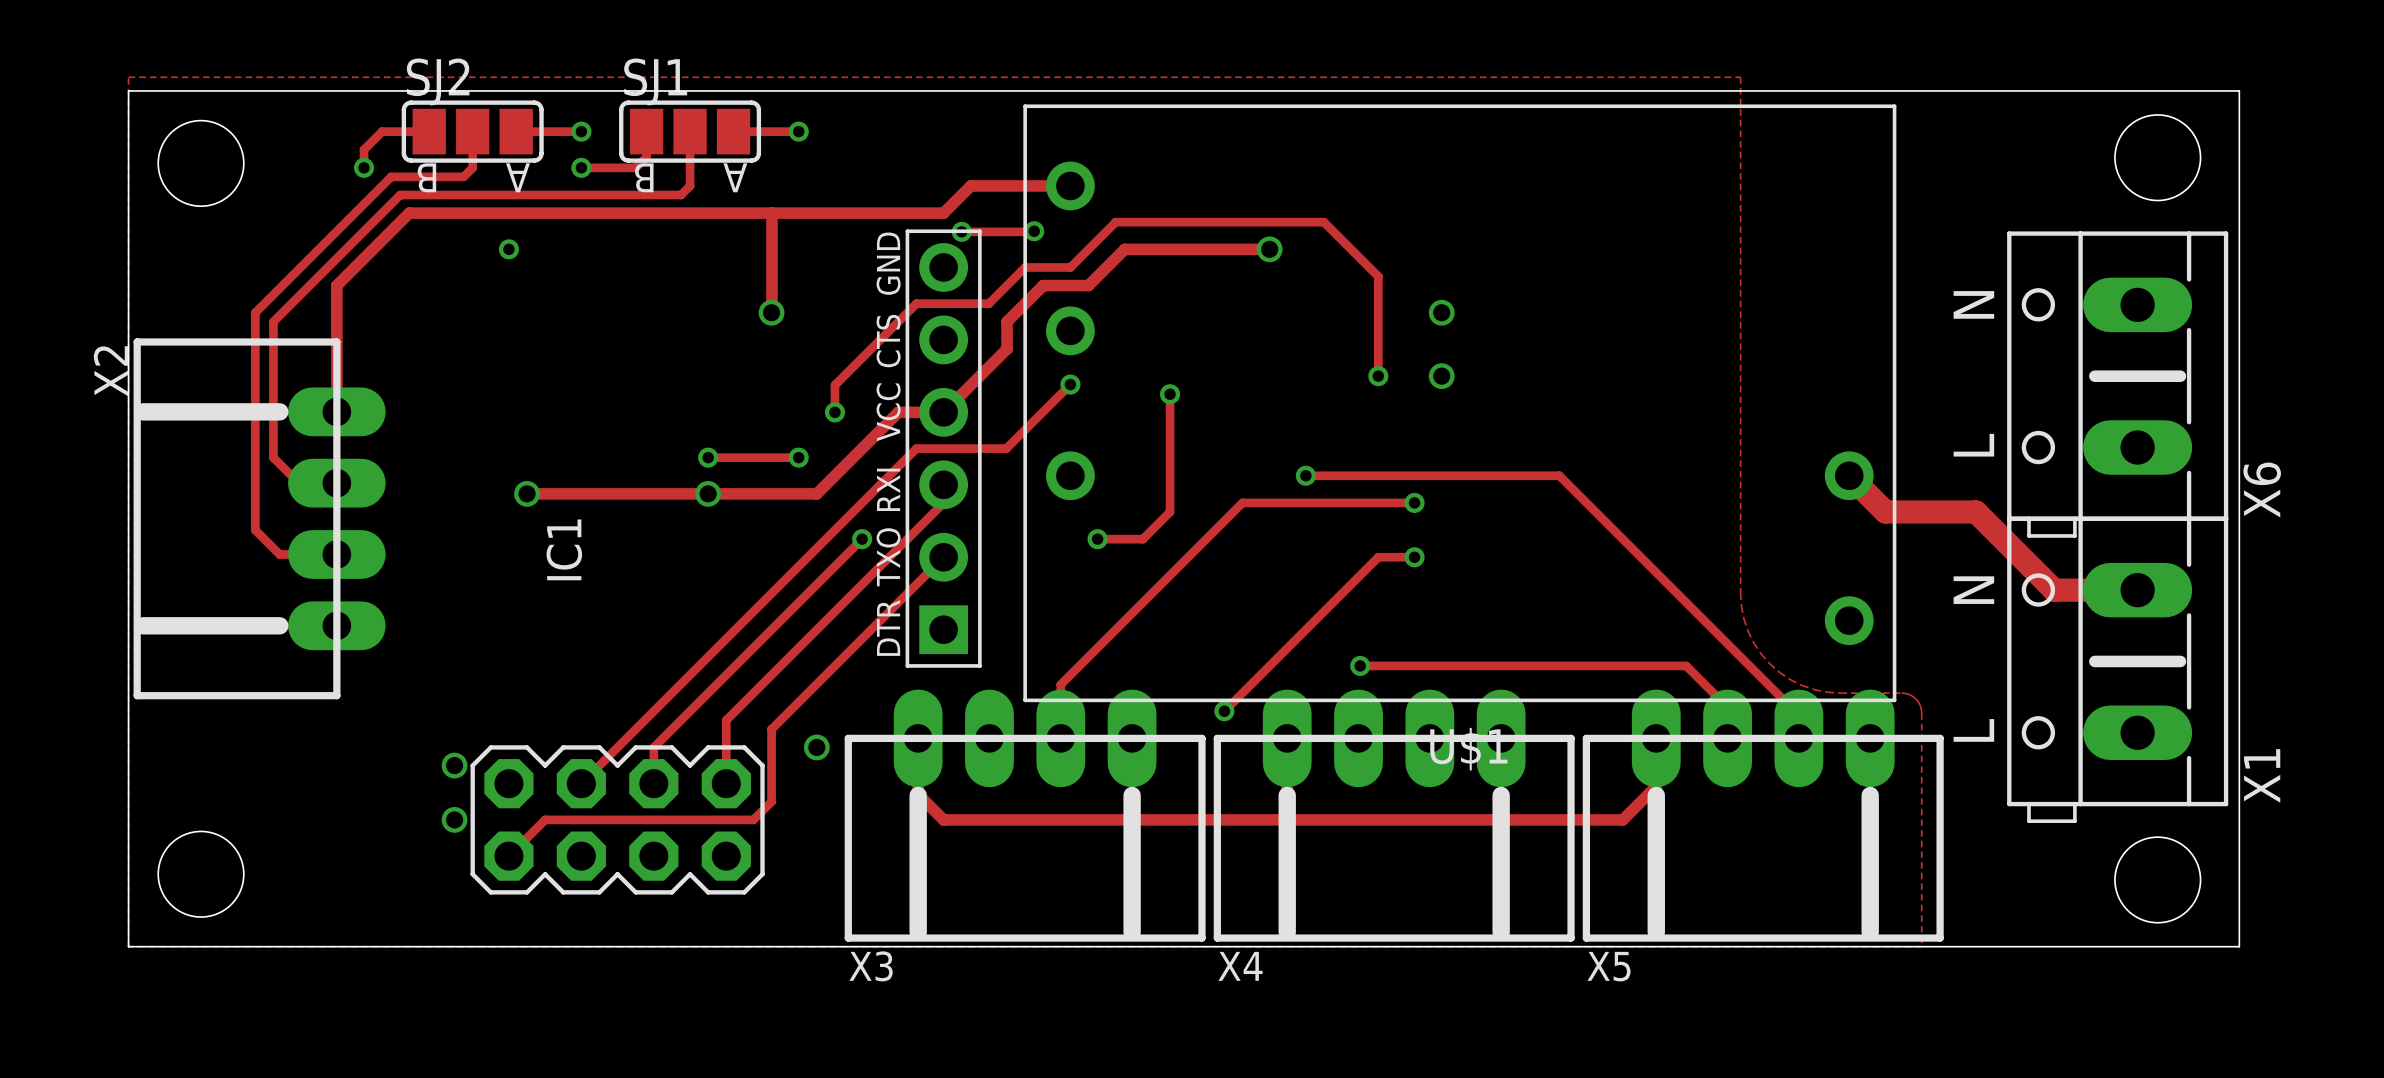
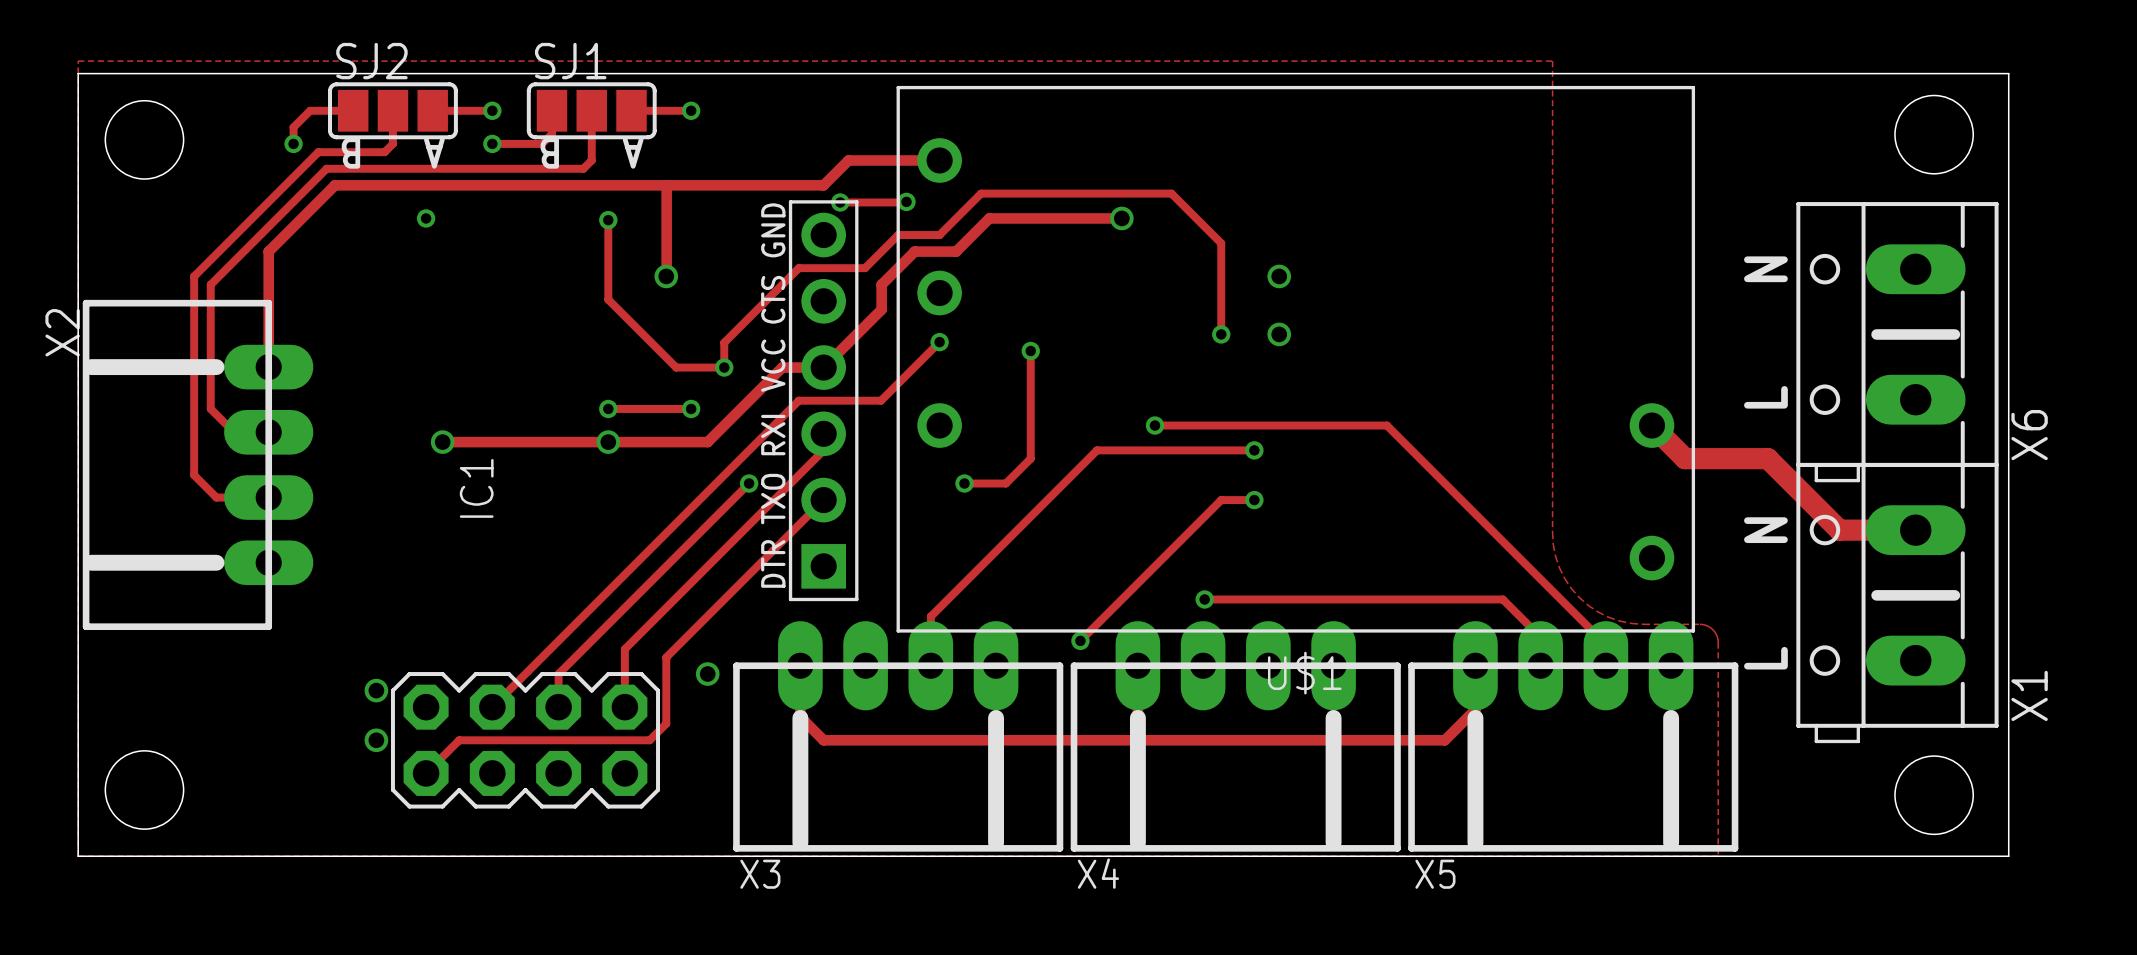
track: none -> (608, 220) (608, 299) (676, 367) (724, 367)
via: none -> (608, 220)

